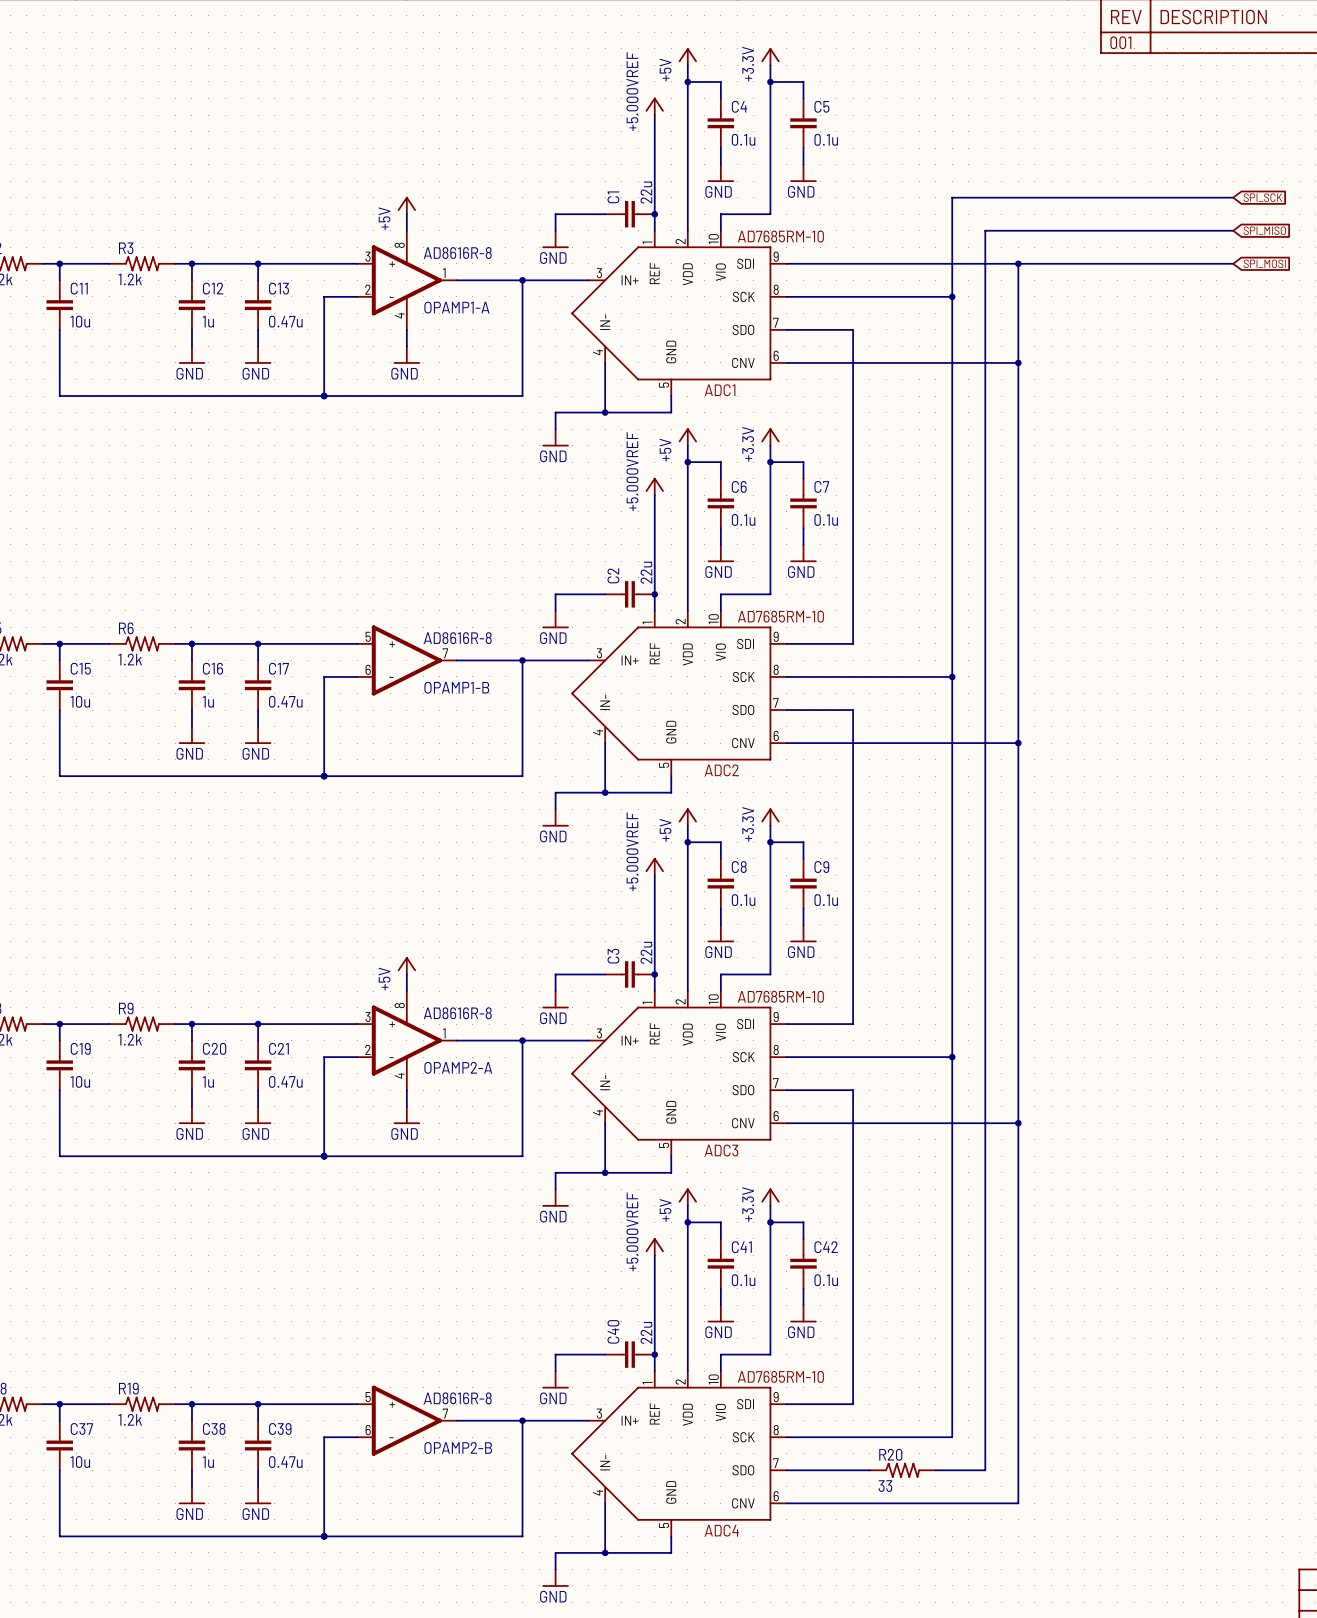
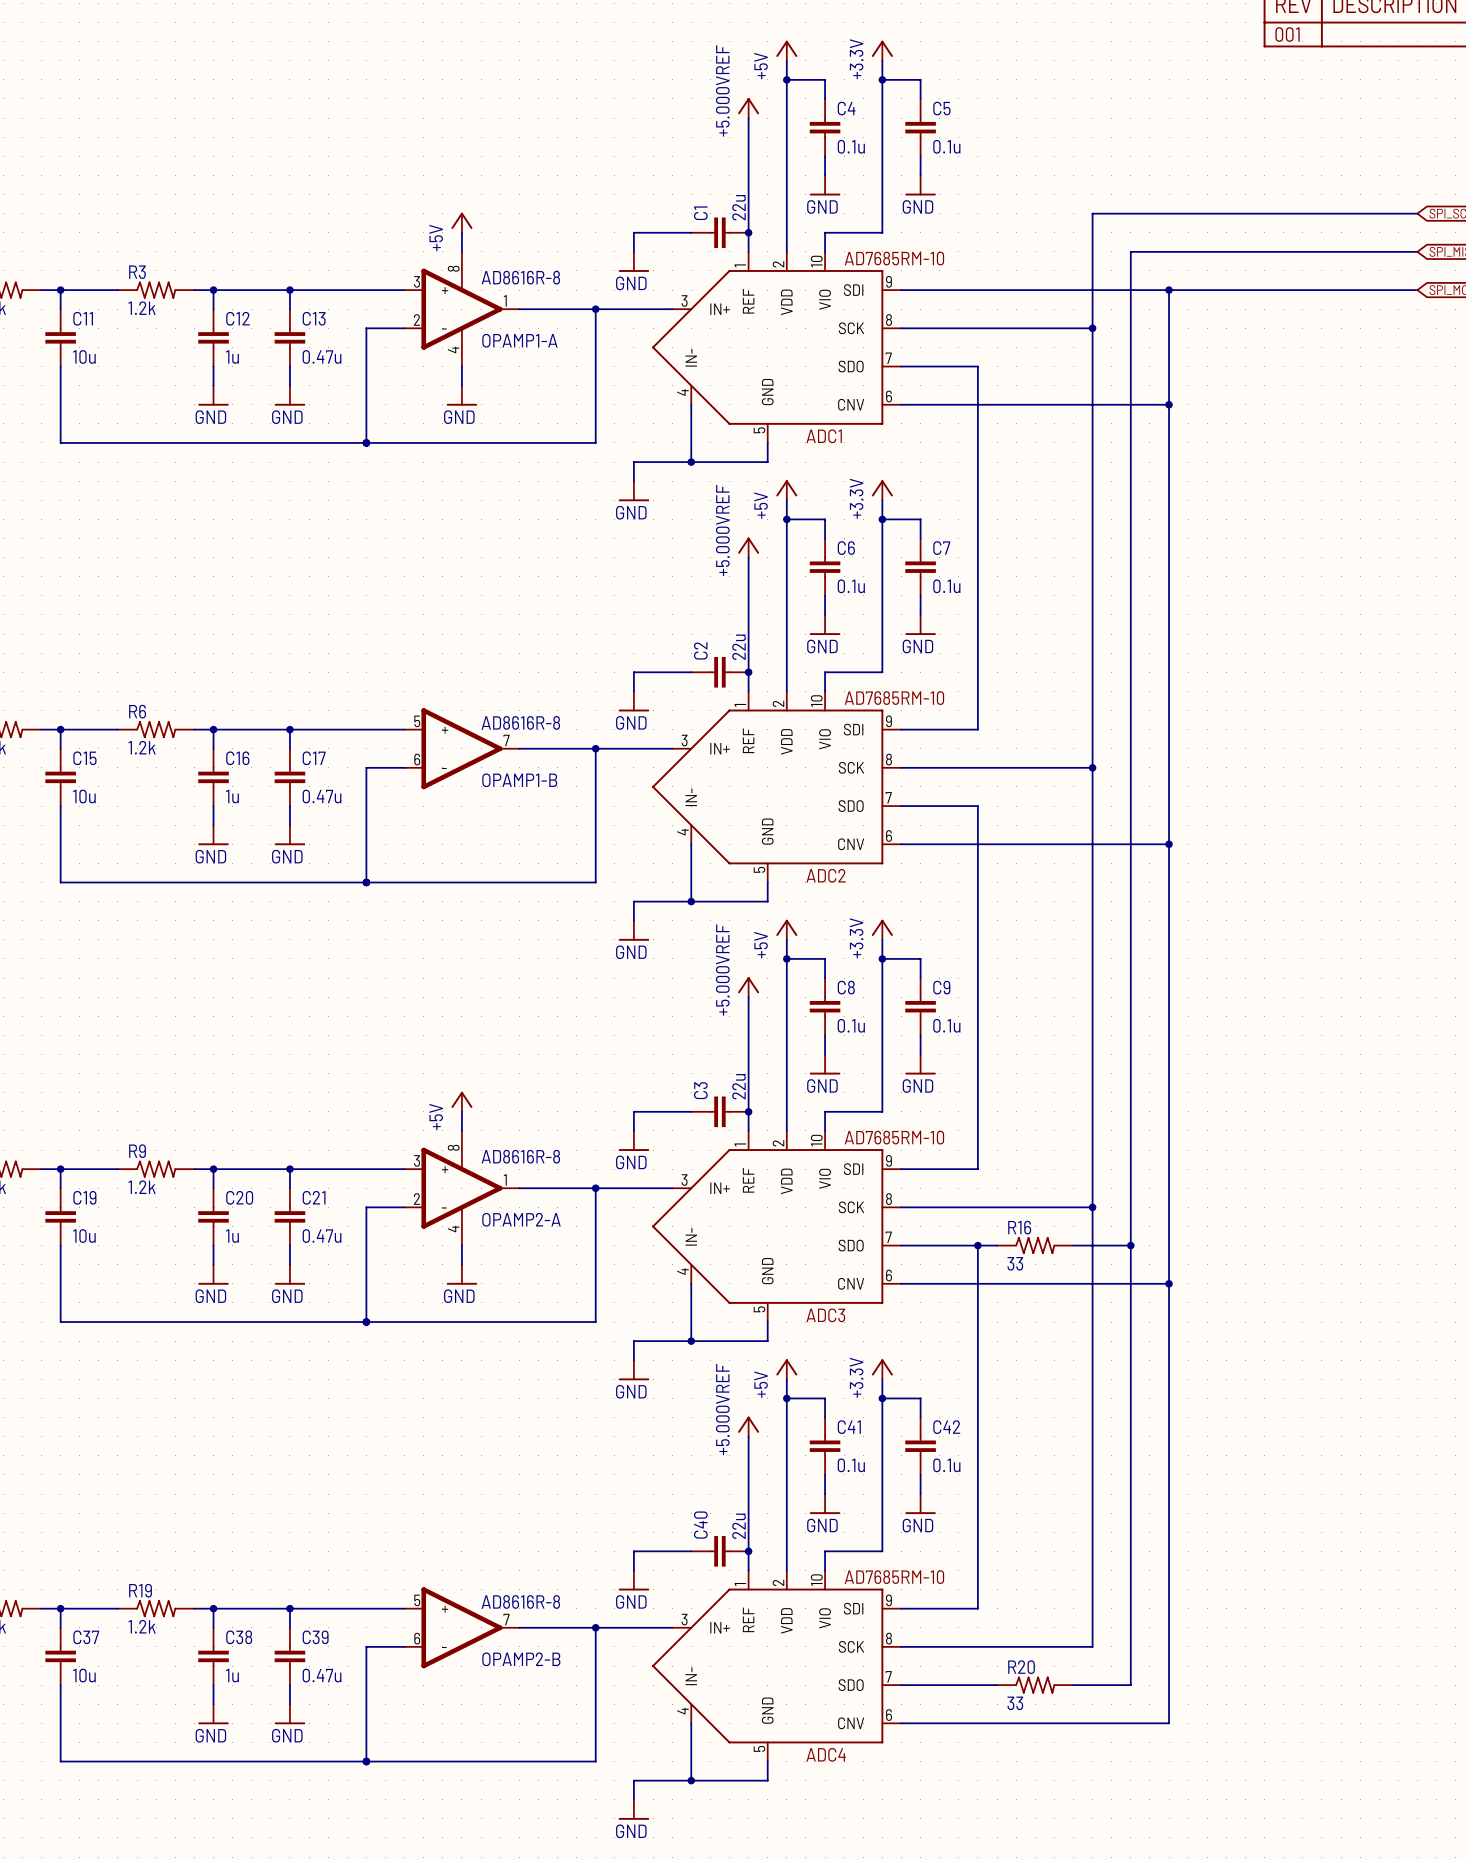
wire: none -> (977, 1245) (997, 1245)
junction: none -> (977, 1245)
R16: none -> 33 (1035, 1245)
wire: none -> (1073, 1245) (1130, 1245)
junction: none -> (1130, 1245)

